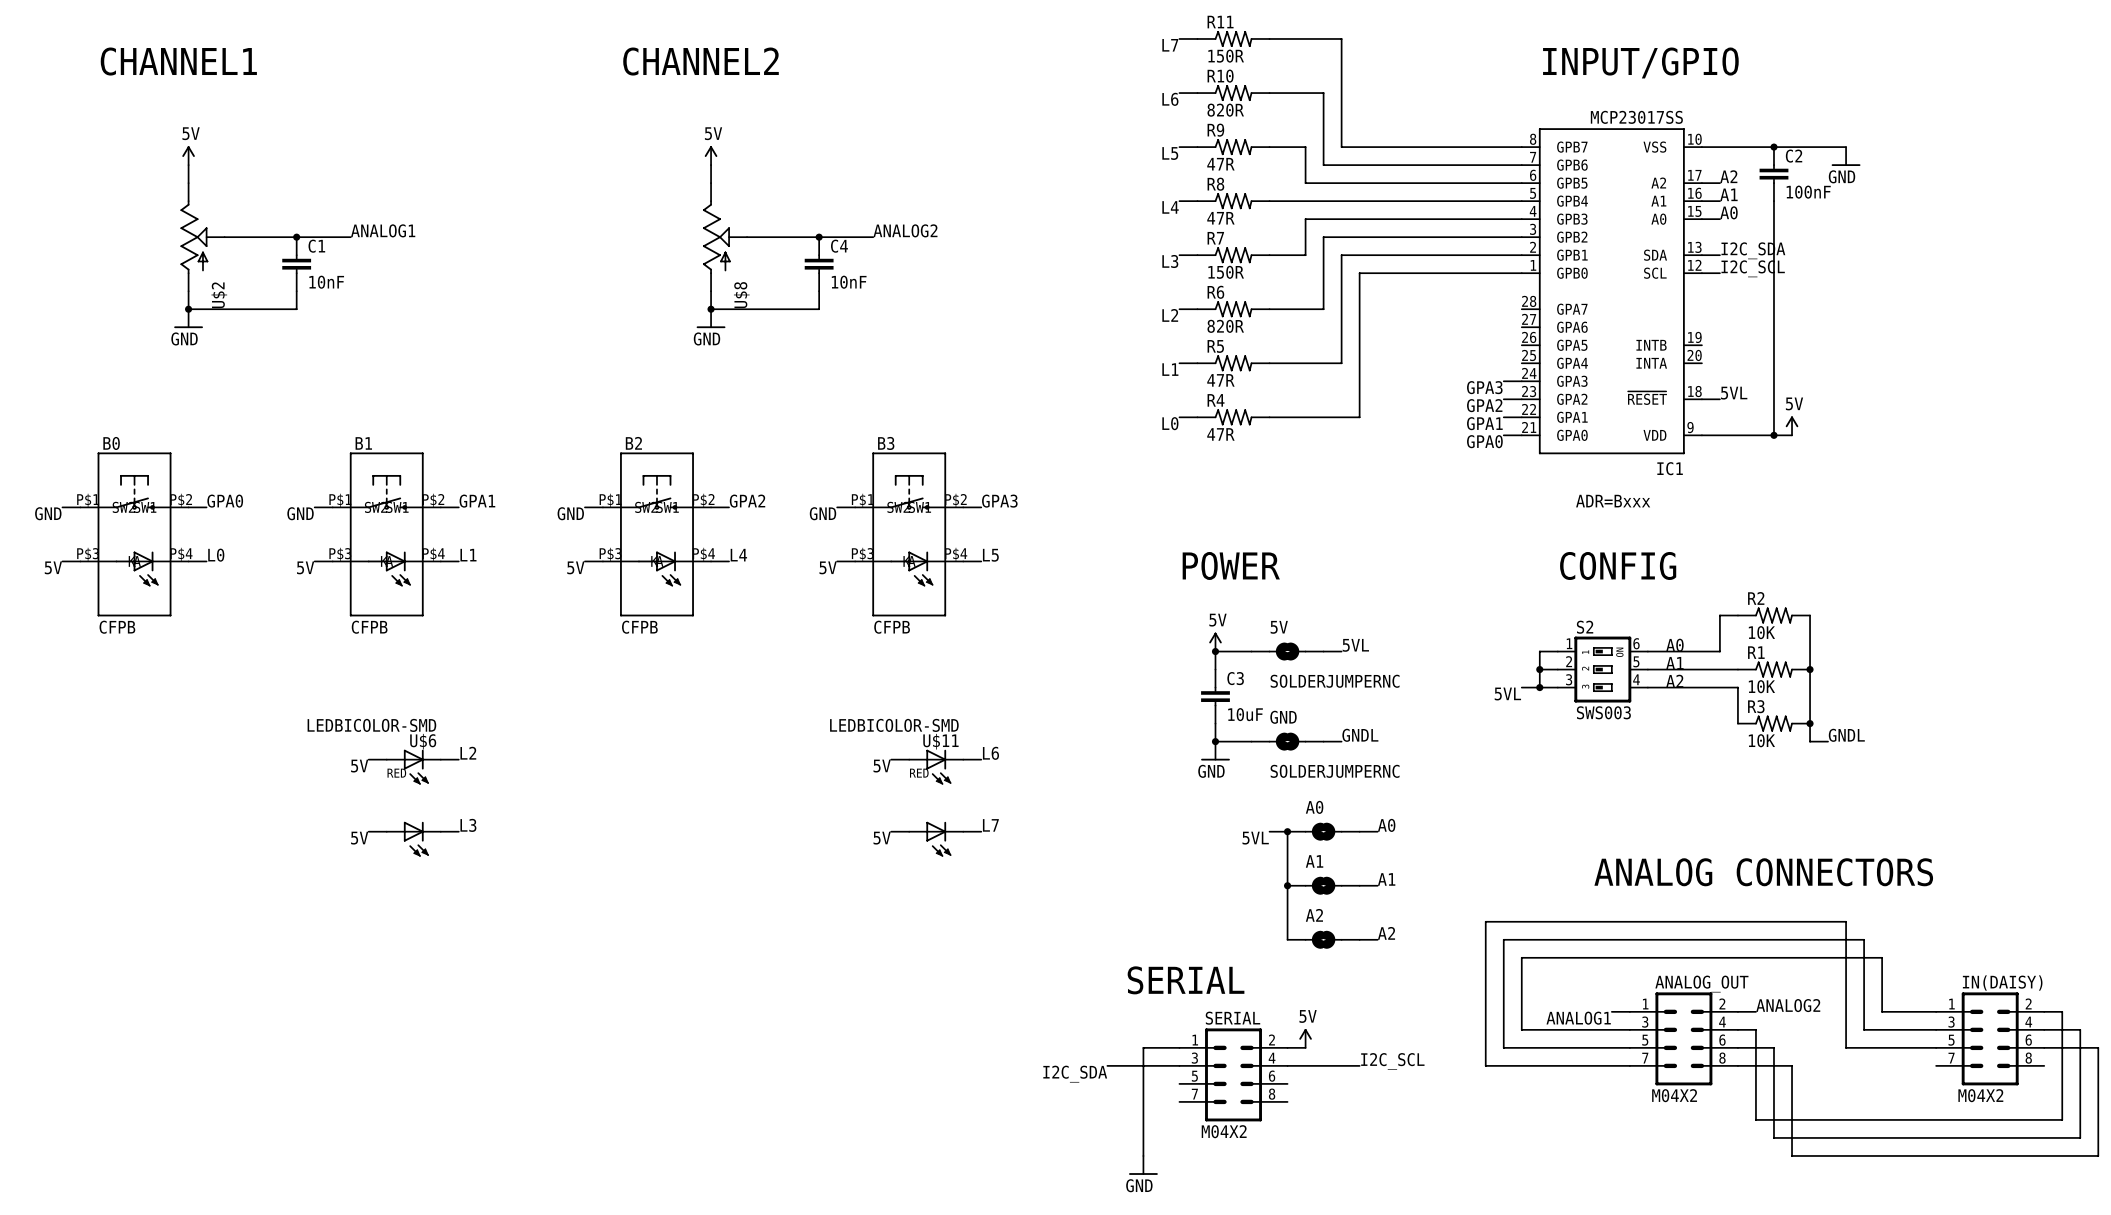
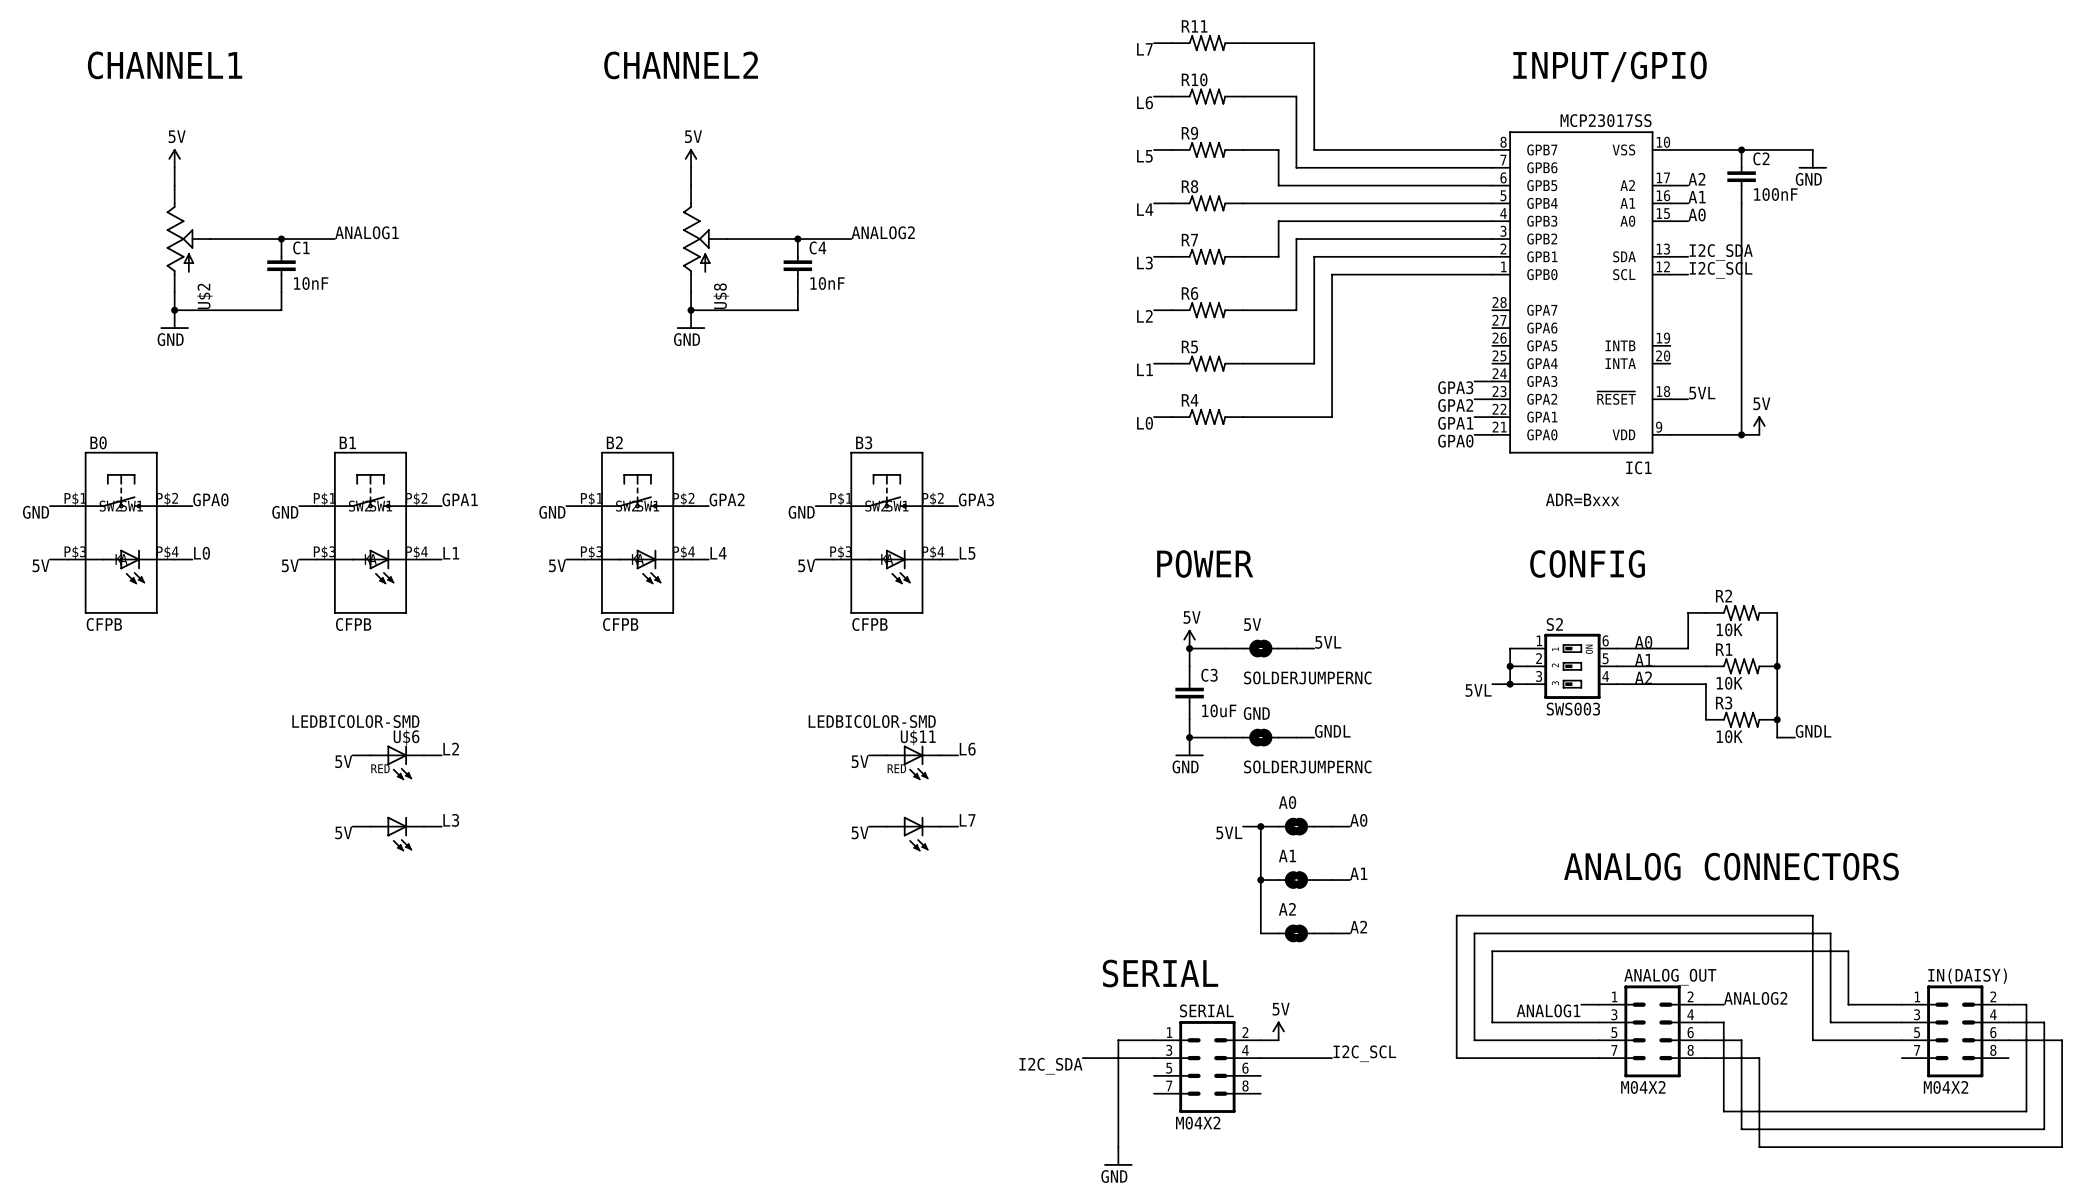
R11 value: 150R (1226, 56) -> none
R10 value: 820R (1225, 110) -> none
R9 value: 47R (1220, 164) -> none
R8 value: 47R (1220, 218) -> none
R7 value: 150R (1226, 272) -> none
R6 value: 820R (1225, 326) -> none
R5 value: 47R (1220, 380) -> none
R4 value: 47R (1220, 434) -> none

